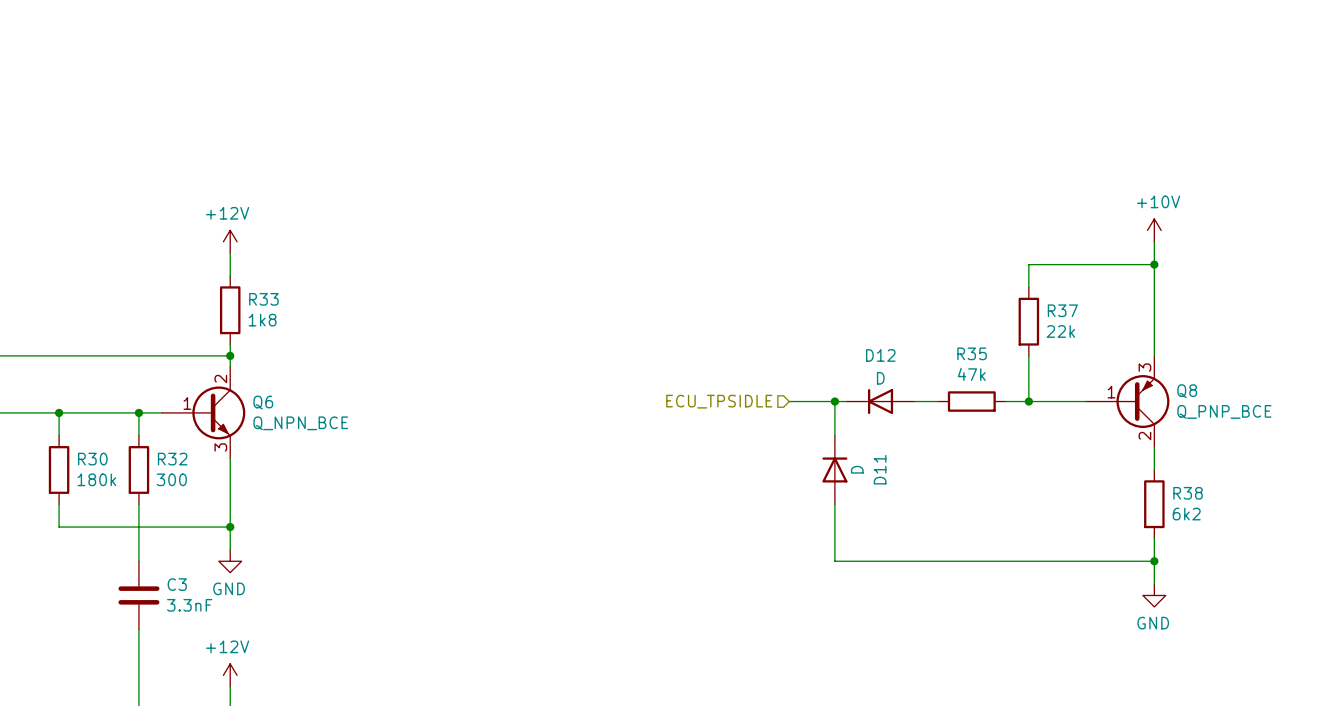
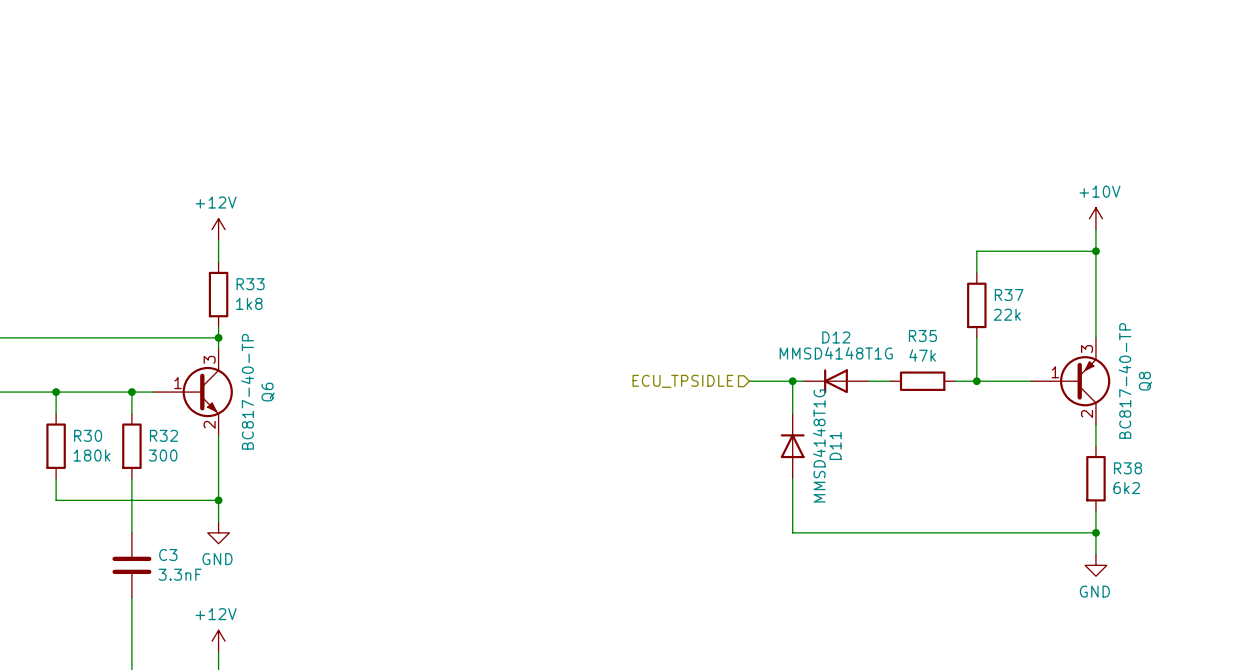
Q6 pin number: 2 (220, 378) -> 3 (209, 359)
D12 value: D (880, 378) -> MMSD4148T1G (836, 353)
Q8 name rotation: 0° (1187, 391) -> 90° counterclockwise (1145, 381)
Q6 name rotation: 0° (263, 402) -> 90° counterclockwise (268, 392)
Q8 value: Q_PNP_BCE (1224, 411) -> BC817-40-TP (1124, 380)
Q6 value: Q_NPN_BCE (300, 423) -> BC817-40-TP (247, 391)
Q6 pin number: 3 (220, 447) -> 2 (209, 424)
D11 value: D (857, 469) -> MMSD4148T1G (819, 445)

